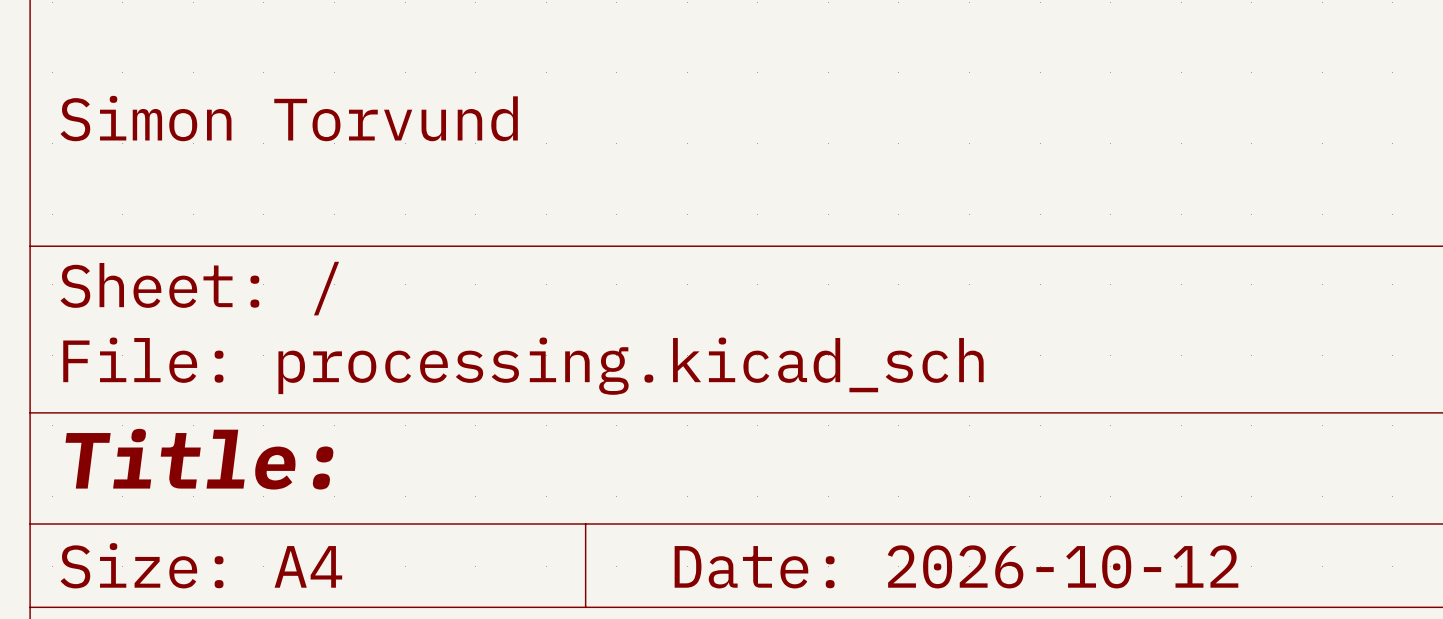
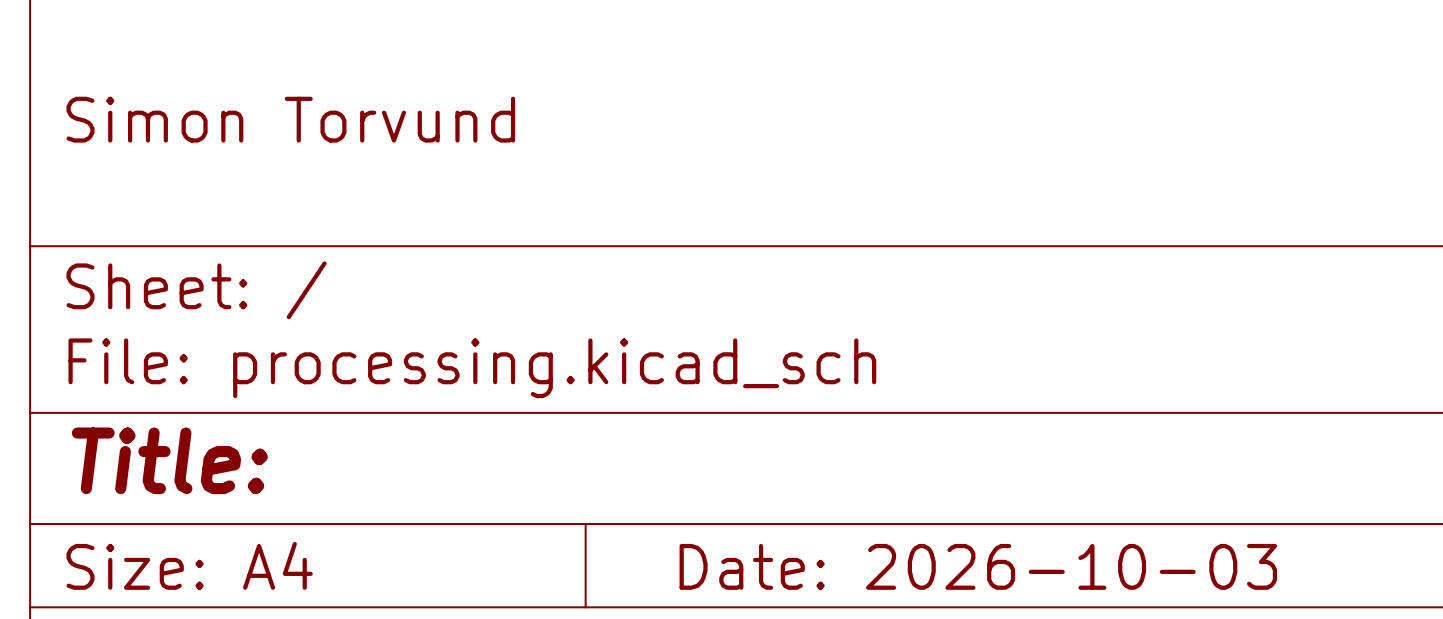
title block: Date: 2026-10-12 (956, 566) -> Date: 2026-10-03 (978, 566)

